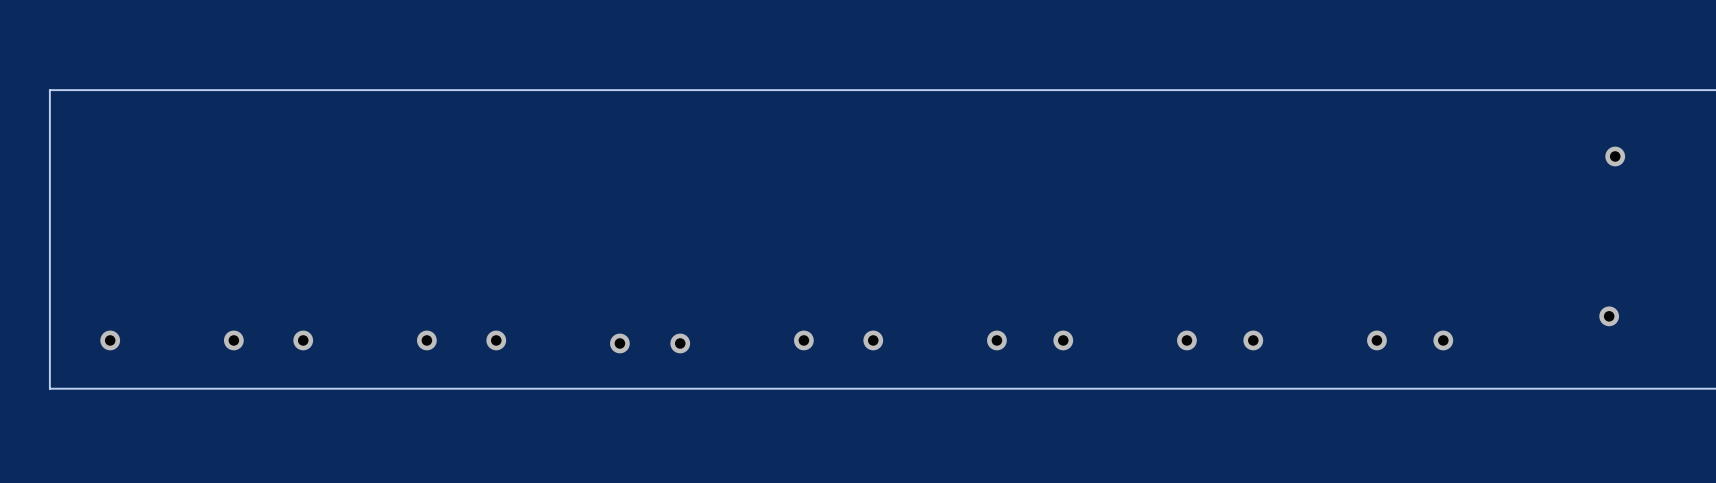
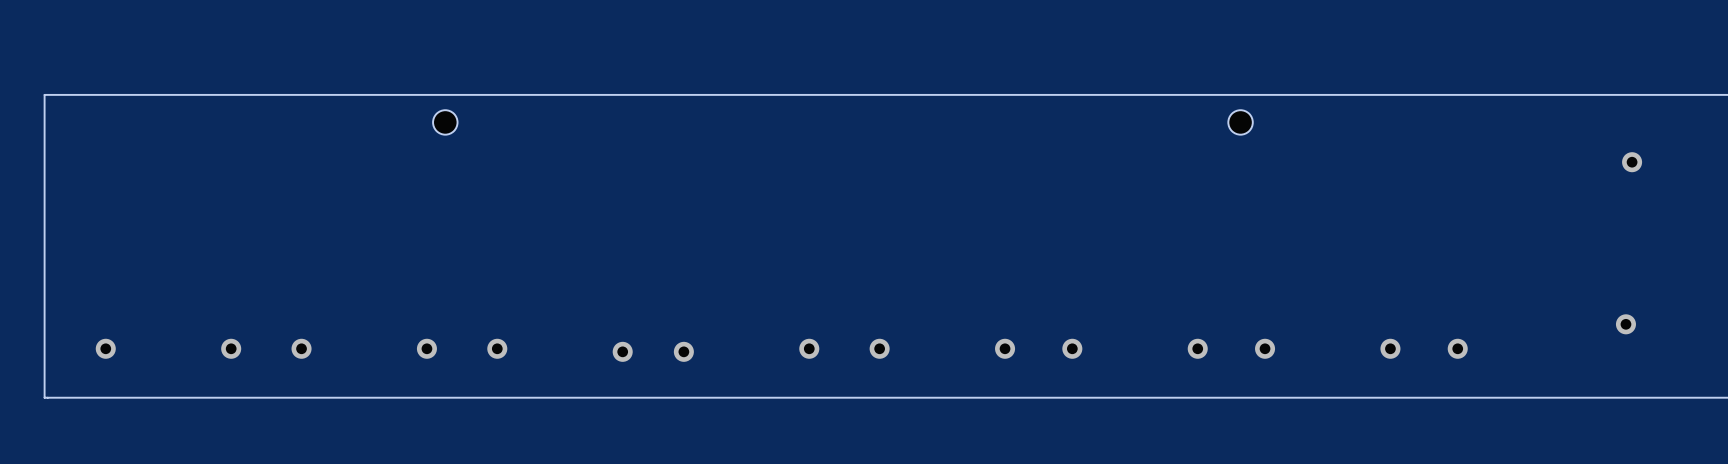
hole: none -> (445, 122)
hole: none -> (1240, 122)

